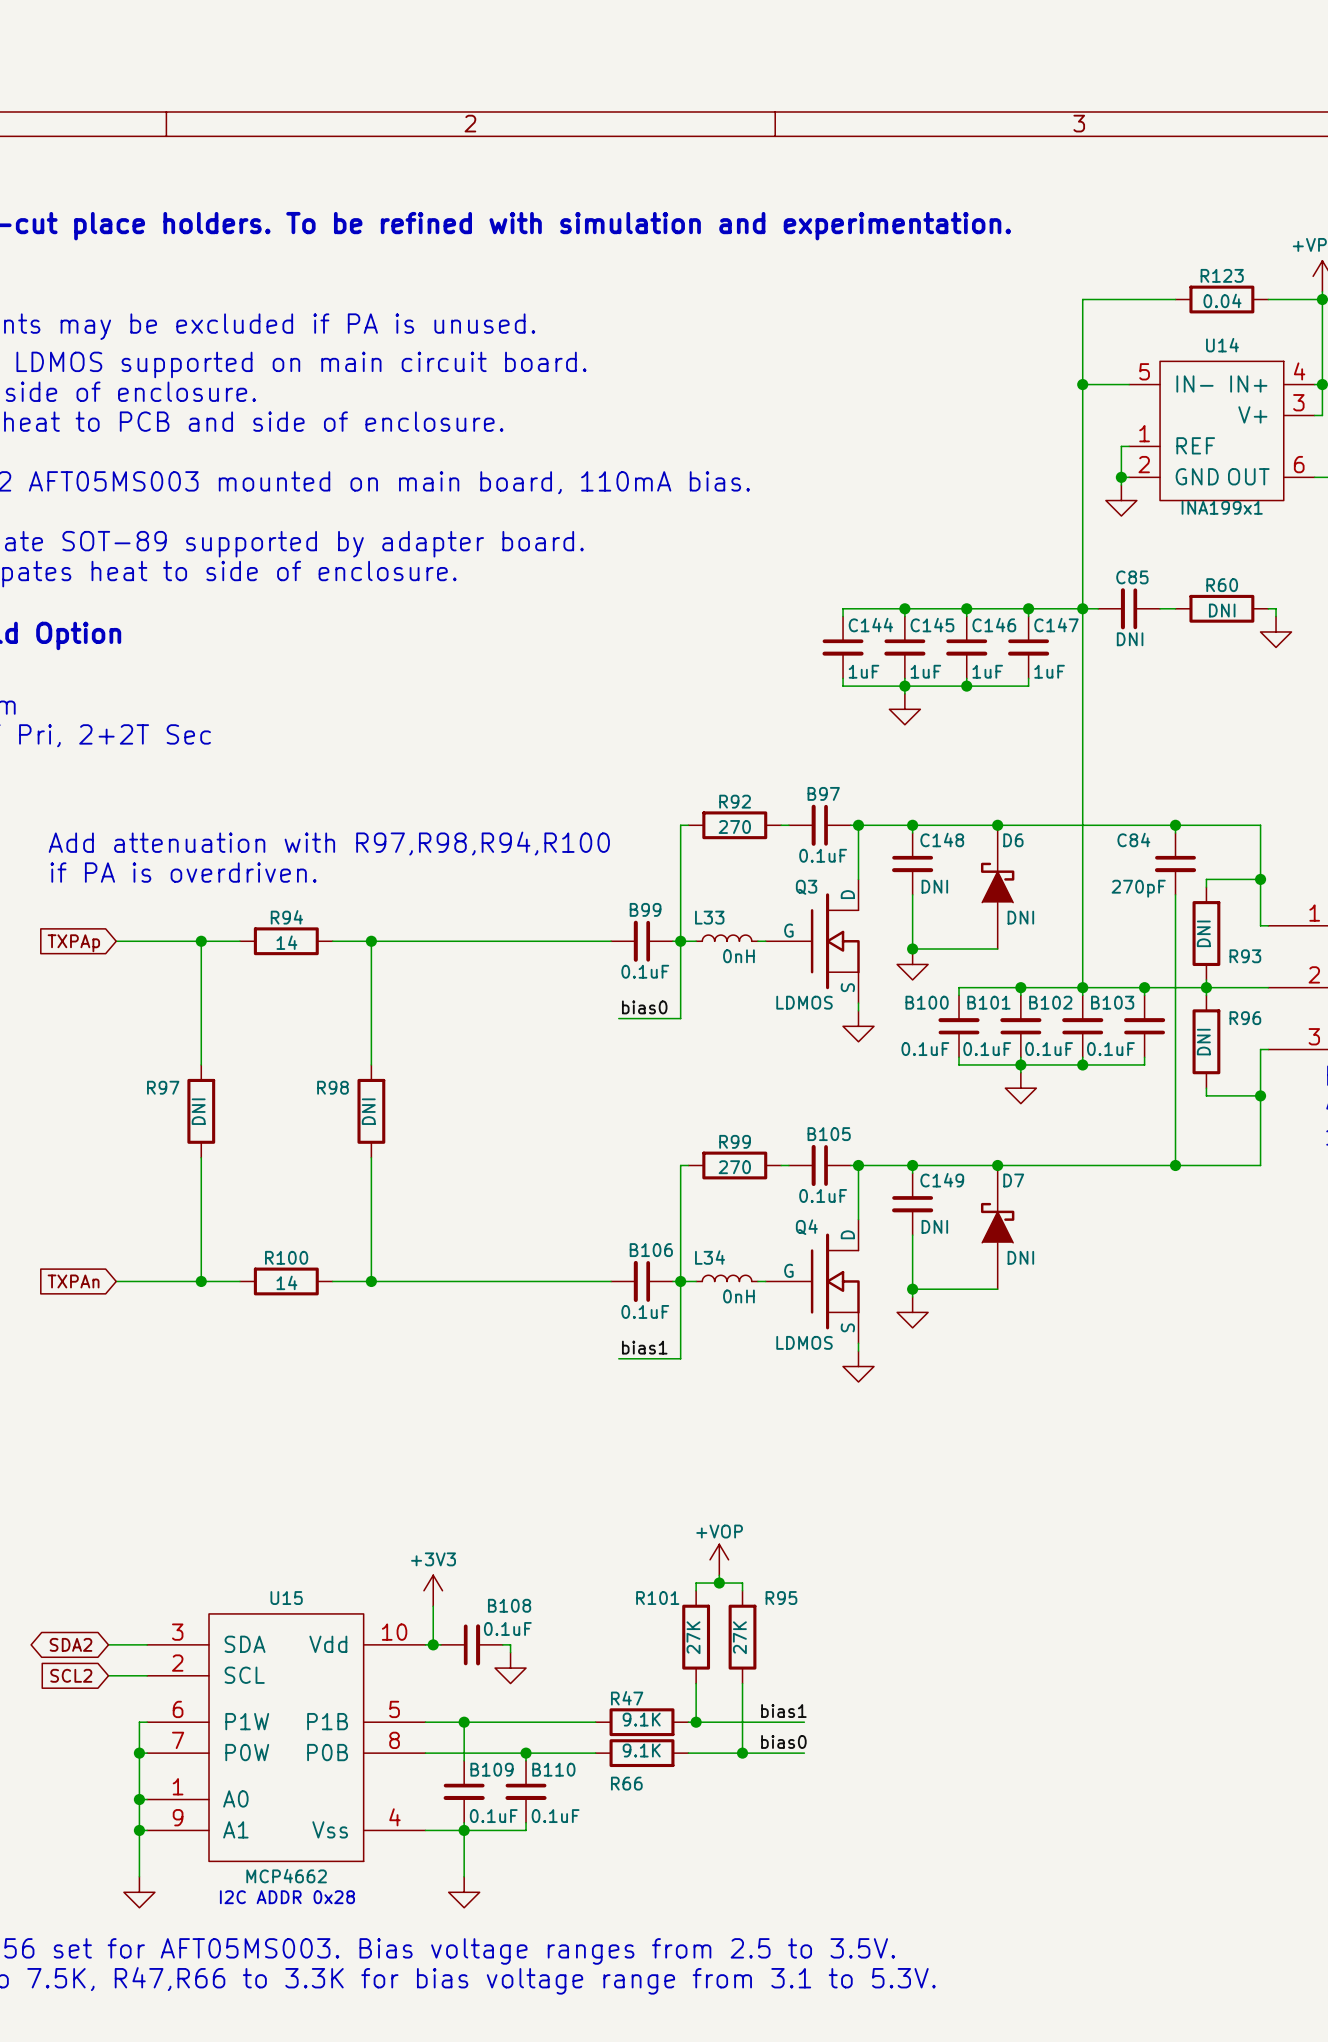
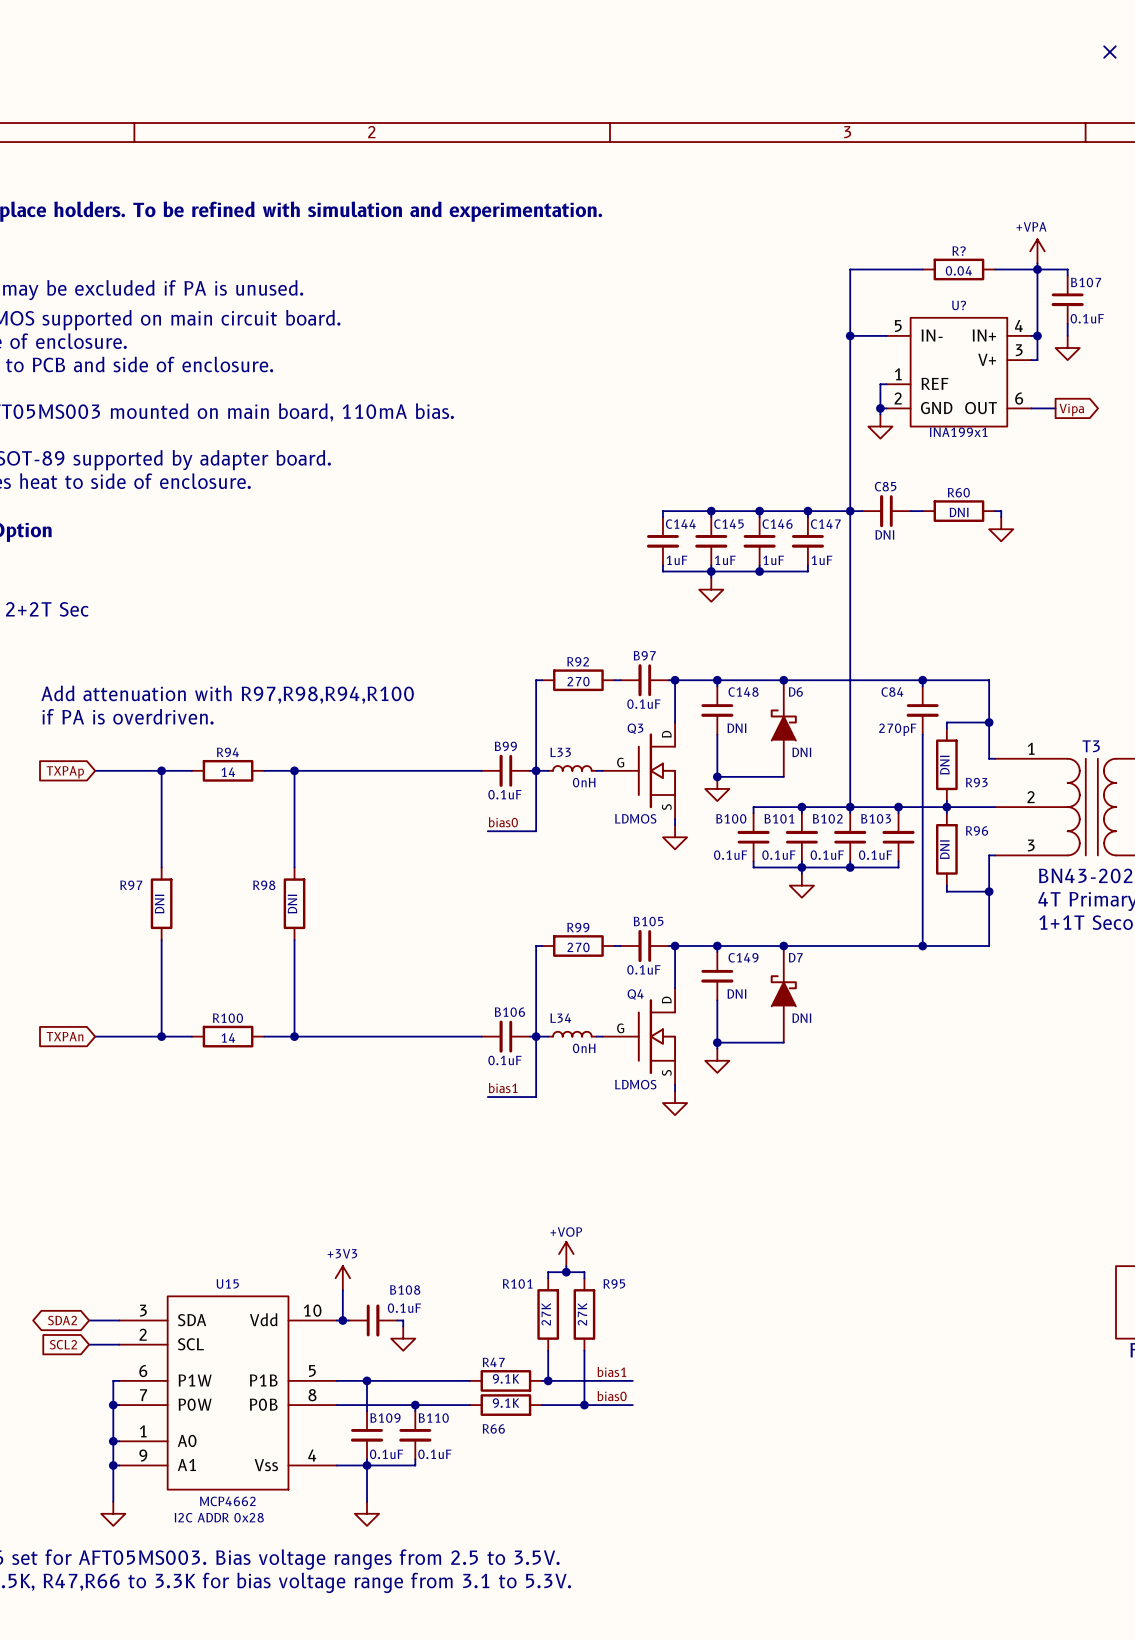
R123 name: R123 (1222, 275) -> R? (959, 251)
U14 name: U14 (1222, 345) -> U? (959, 305)

